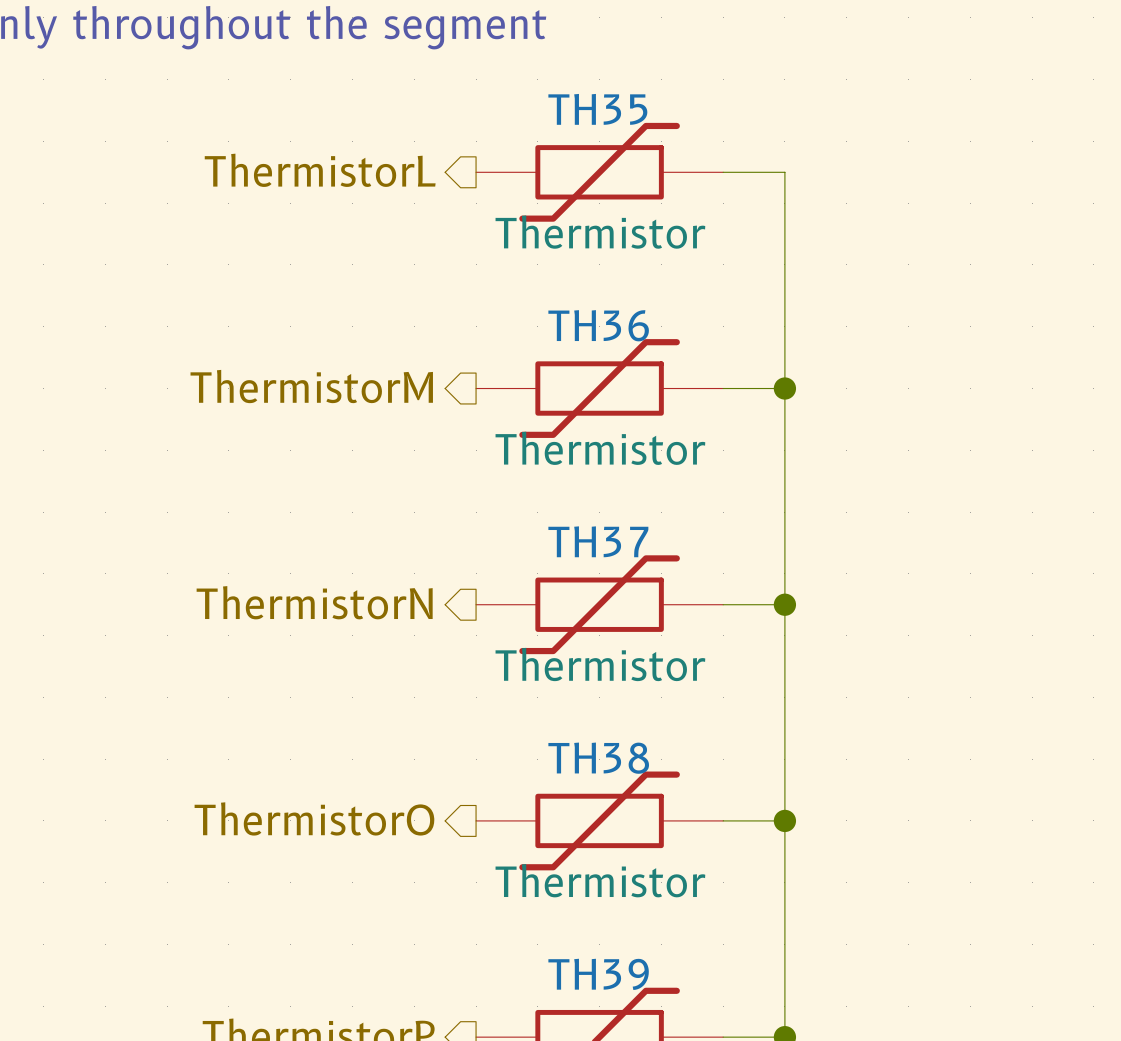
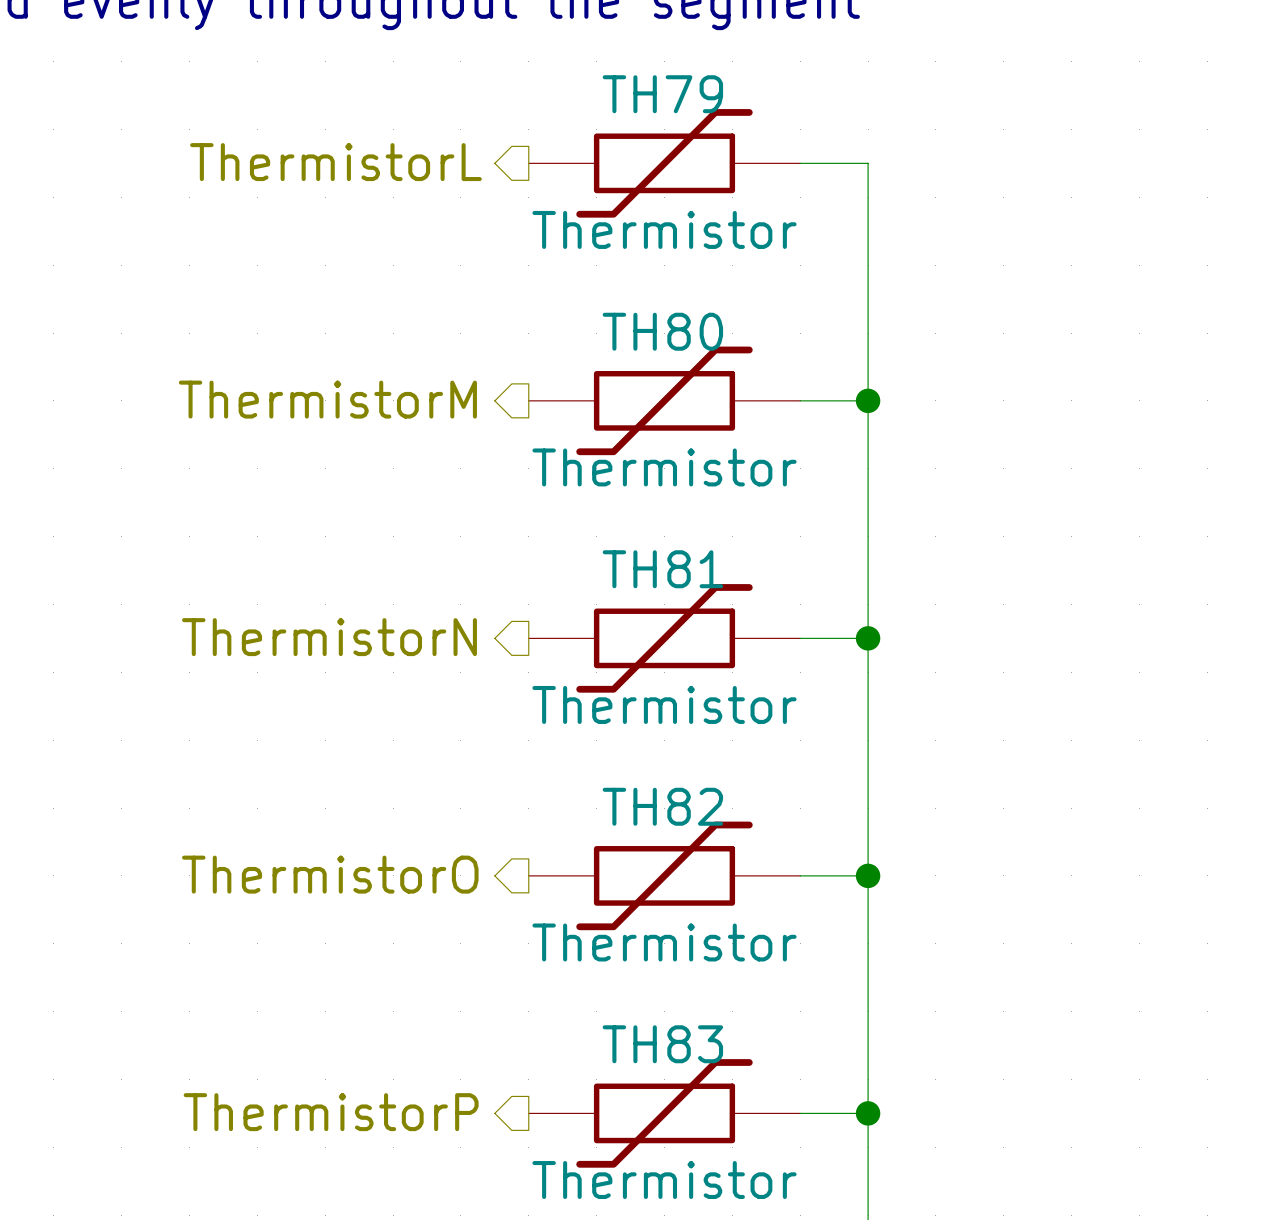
TH35 name: TH35 (597, 109) -> TH79 (662, 94)
TH36 name: TH36 (598, 325) -> TH80 (662, 331)
TH37 name: TH37 (598, 541) -> TH81 (662, 569)
TH38 name: TH38 (598, 758) -> TH82 (662, 806)
TH39 name: TH39 (598, 974) -> TH83 (662, 1044)

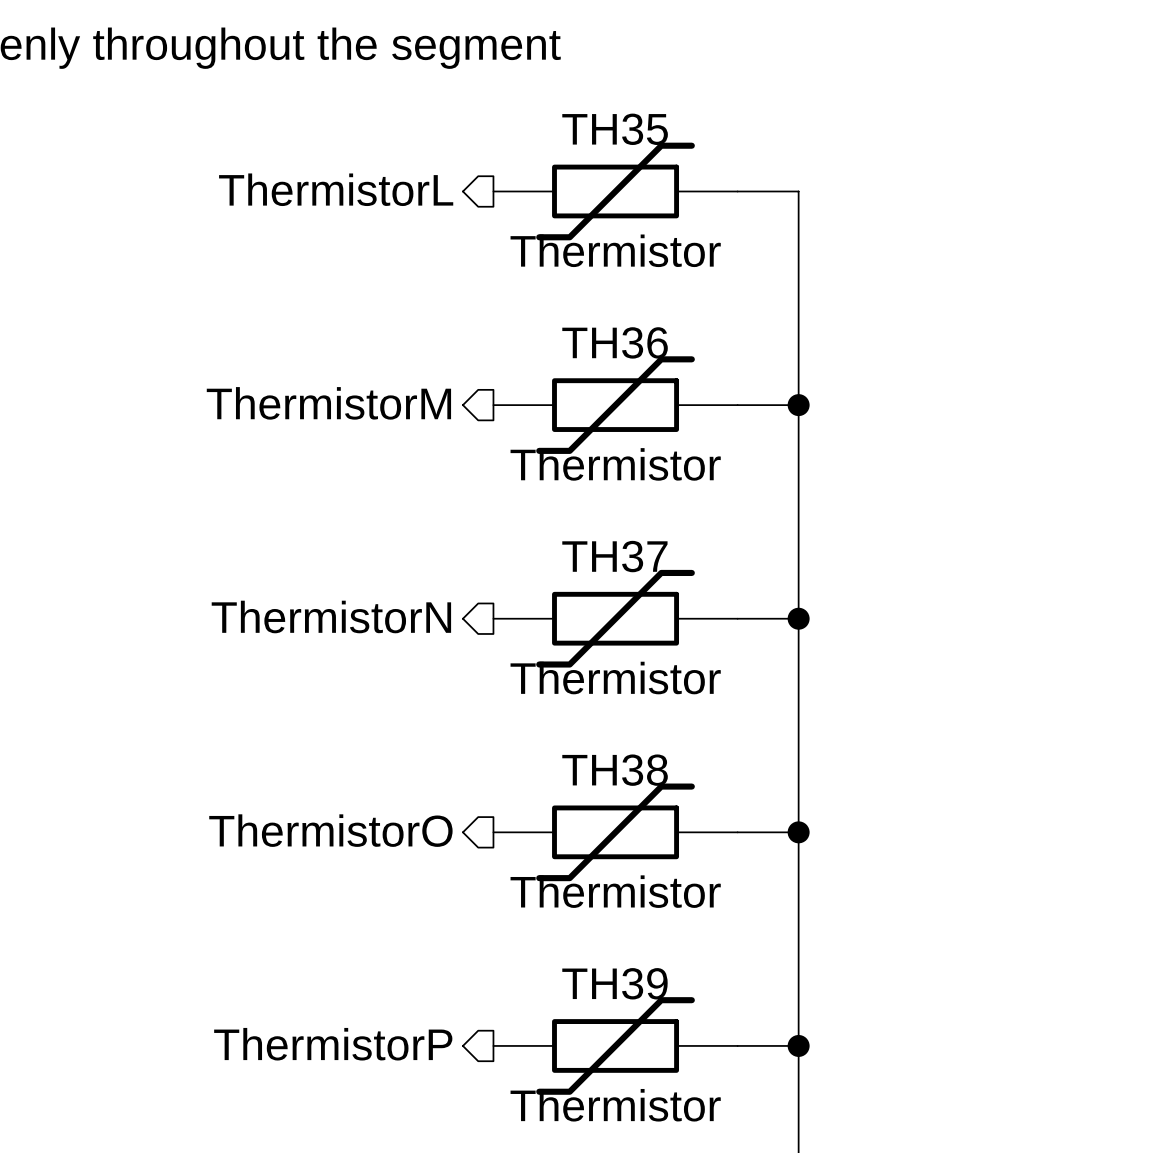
TH79 name: TH79 (662, 94) -> TH35 (615, 129)
TH80 name: TH80 (662, 331) -> TH36 (615, 342)
TH81 name: TH81 (662, 569) -> TH37 (614, 556)
TH82 name: TH82 (662, 806) -> TH38 (615, 770)
TH83 name: TH83 (662, 1044) -> TH39 (614, 983)

